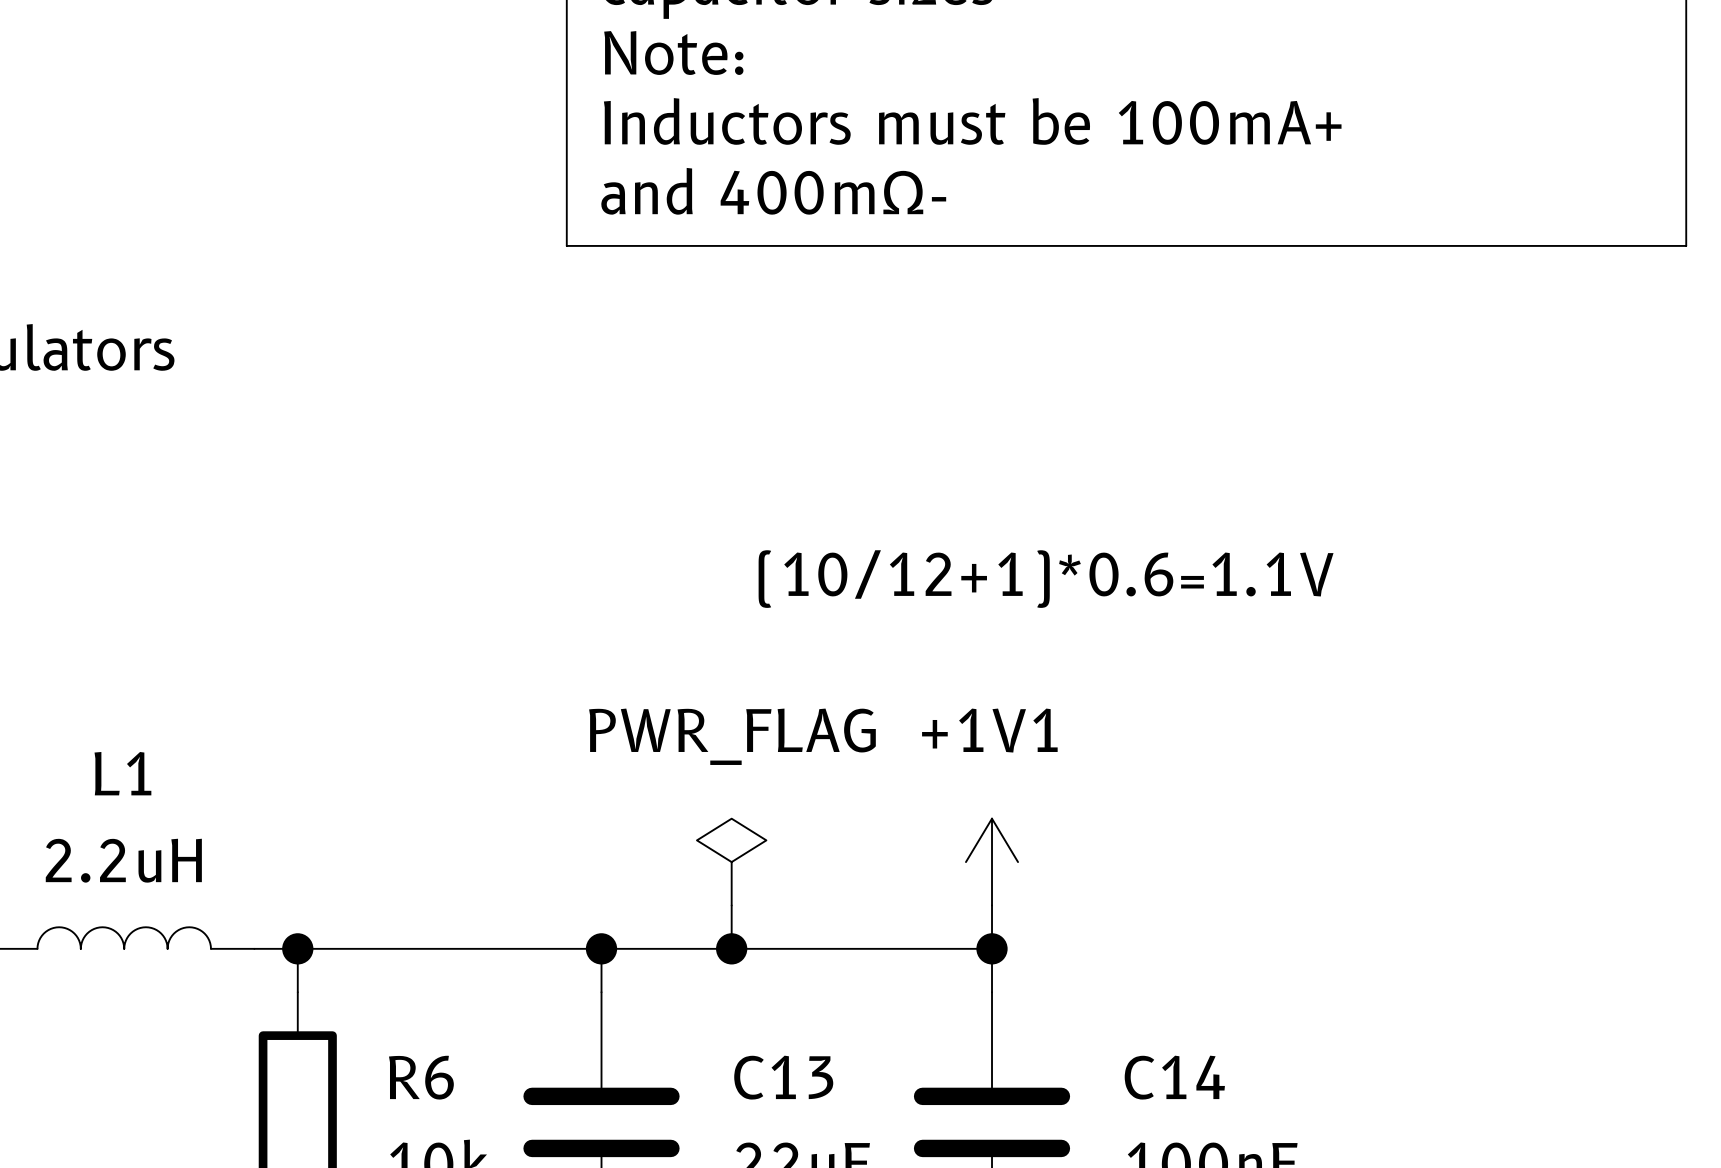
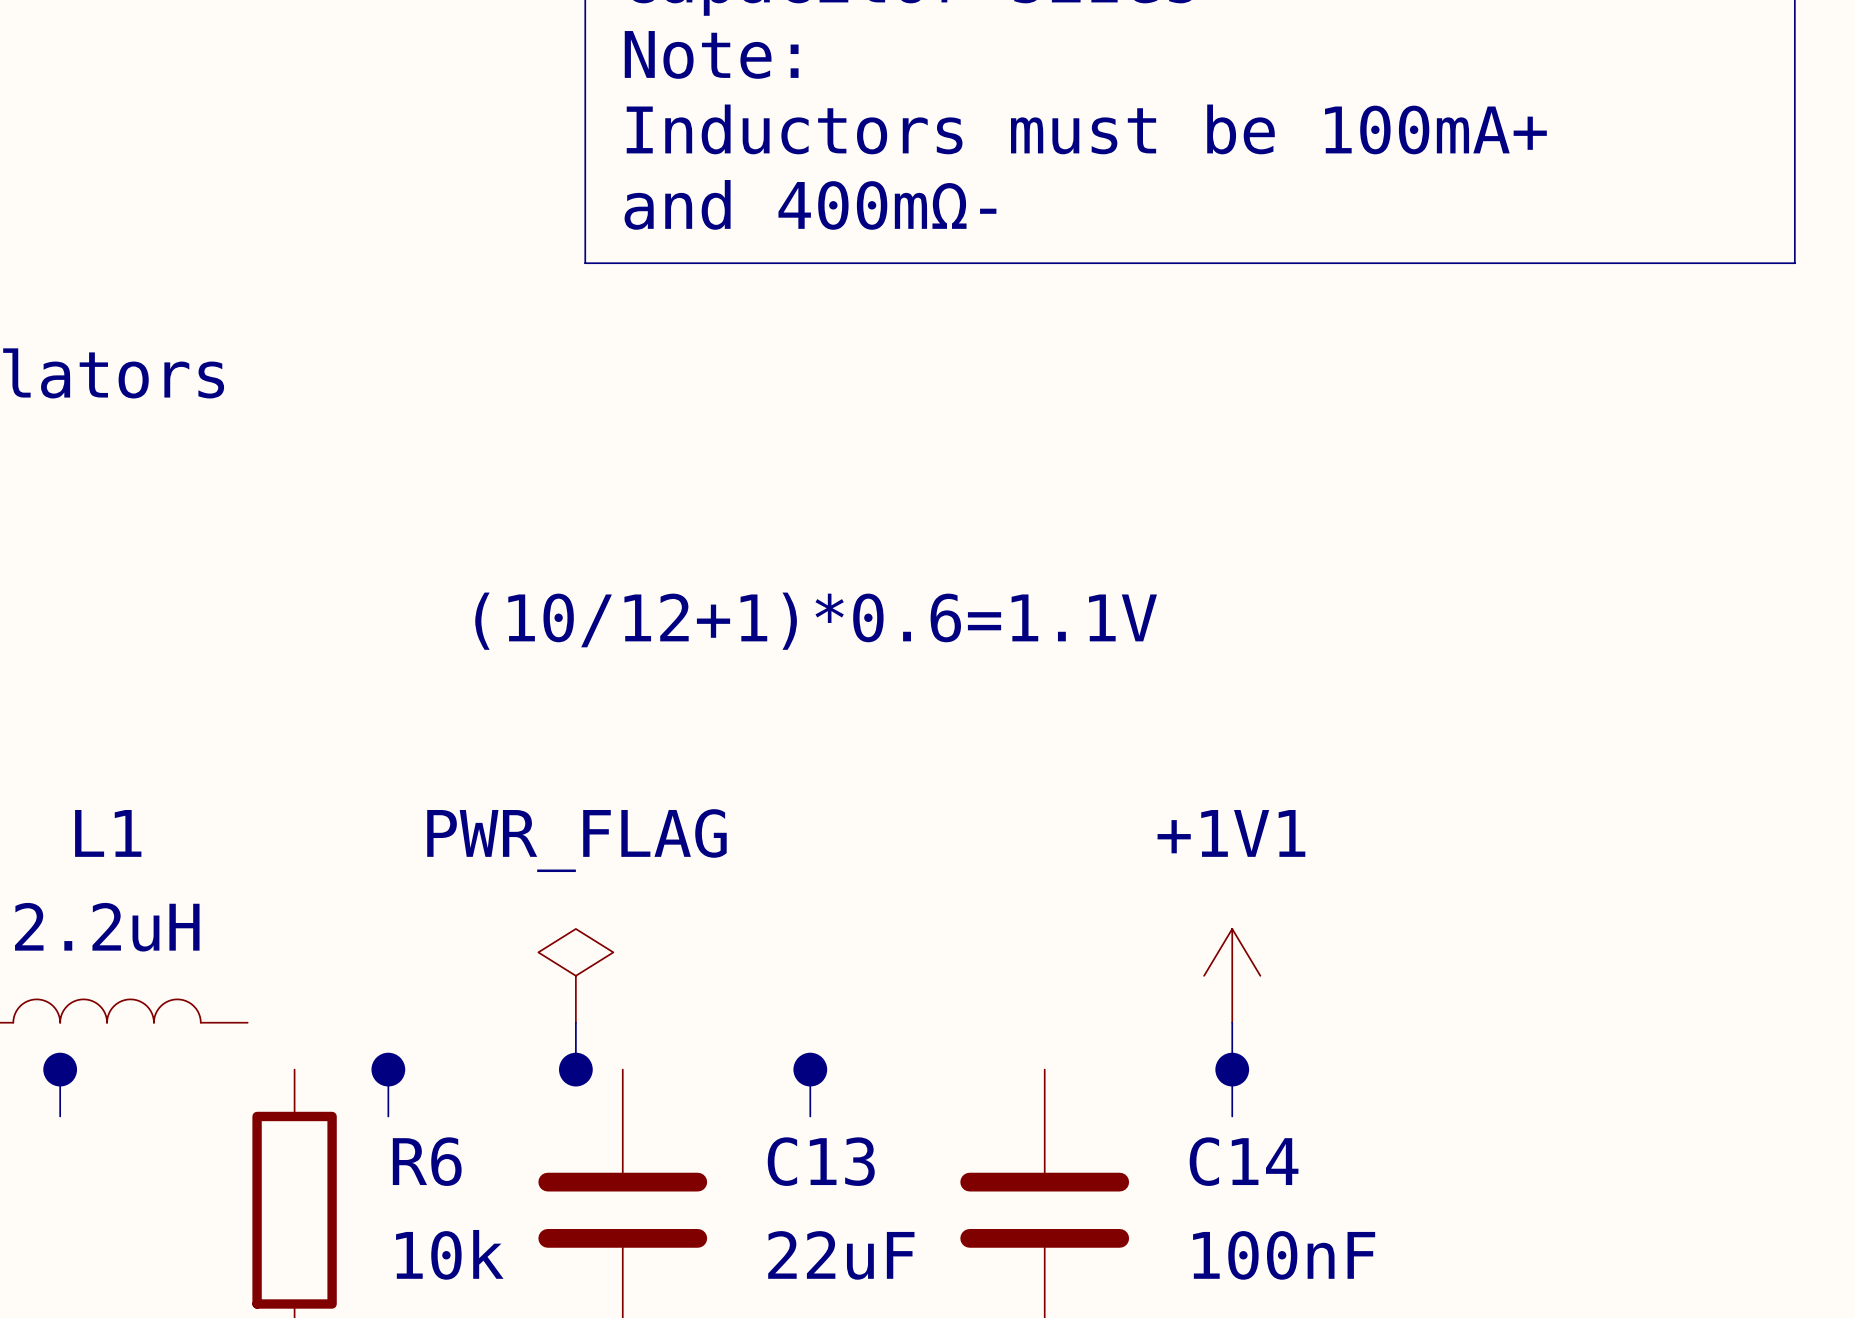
text position: (10/12+1)*0.6=1.1V (1046, 579) -> (10/12+1)*0.6=1.1V (816, 621)
power symbol position: PWR_FLAG (731, 862) -> PWR_FLAG (575, 975)
power symbol position: +1V1 (992, 862) -> +1V1 (1232, 975)
wire: (731, 905) (731, 948) -> (810, 1069) (810, 1116)
wire: (992, 905) (992, 992) -> (1232, 1022) (1232, 1116)
wire: (254, 948) (992, 948) -> none
wire: (297, 948) (297, 992) -> (60, 1069) (60, 1116)
junction position: (297, 948) -> (388, 1069)
wire: none -> (575, 1022) (575, 1069)
wire: (601, 948) (601, 992) -> (388, 1069) (388, 1116)
junction position: (601, 948) -> (575, 1069)
junction position: (731, 948) -> (810, 1069)
junction: (992, 948) -> none
junction: none -> (60, 1069)
junction: none -> (1232, 1069)

